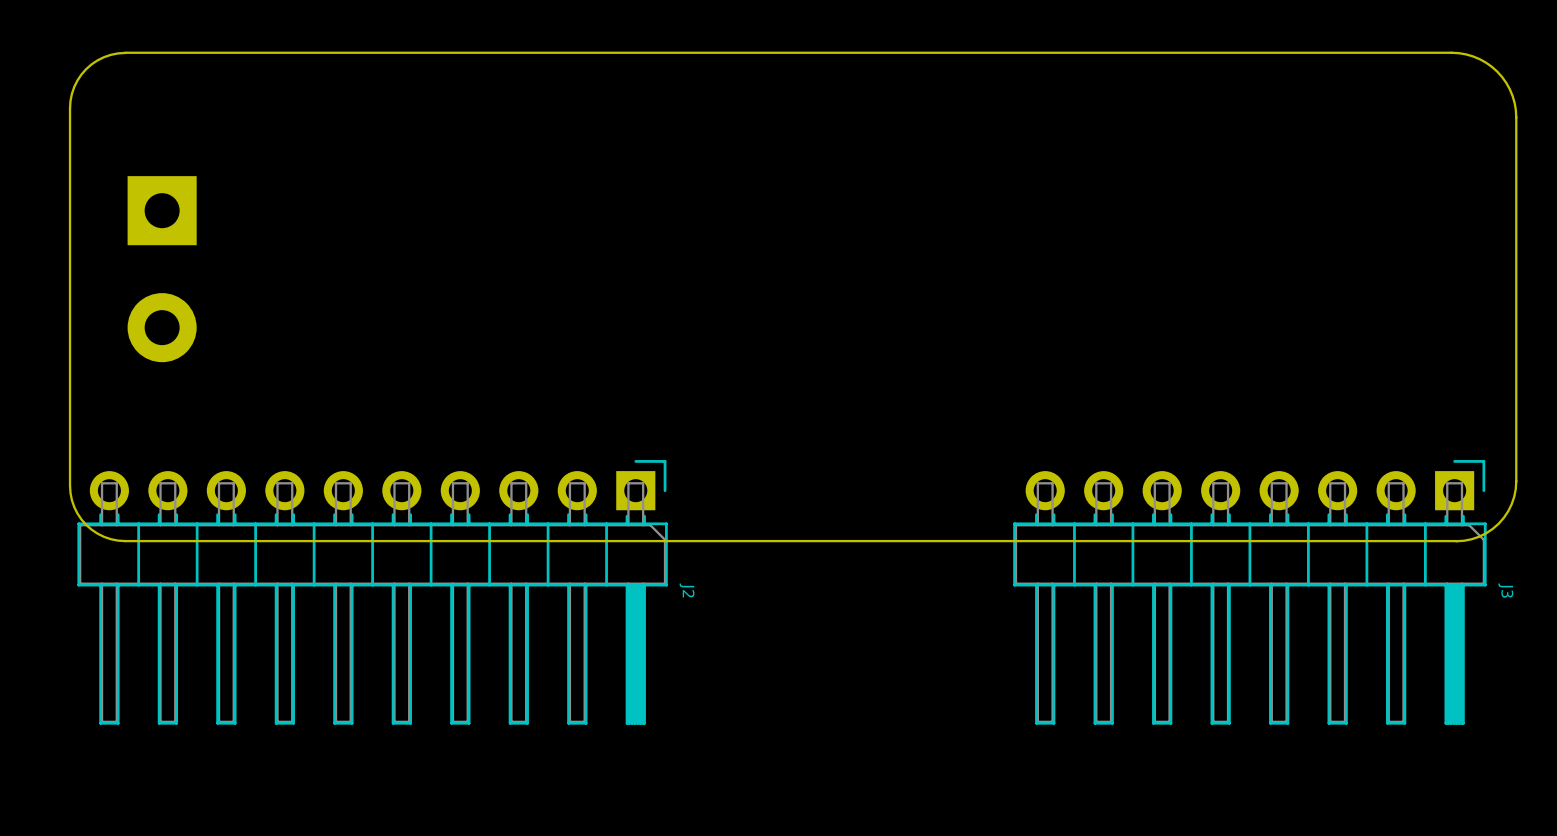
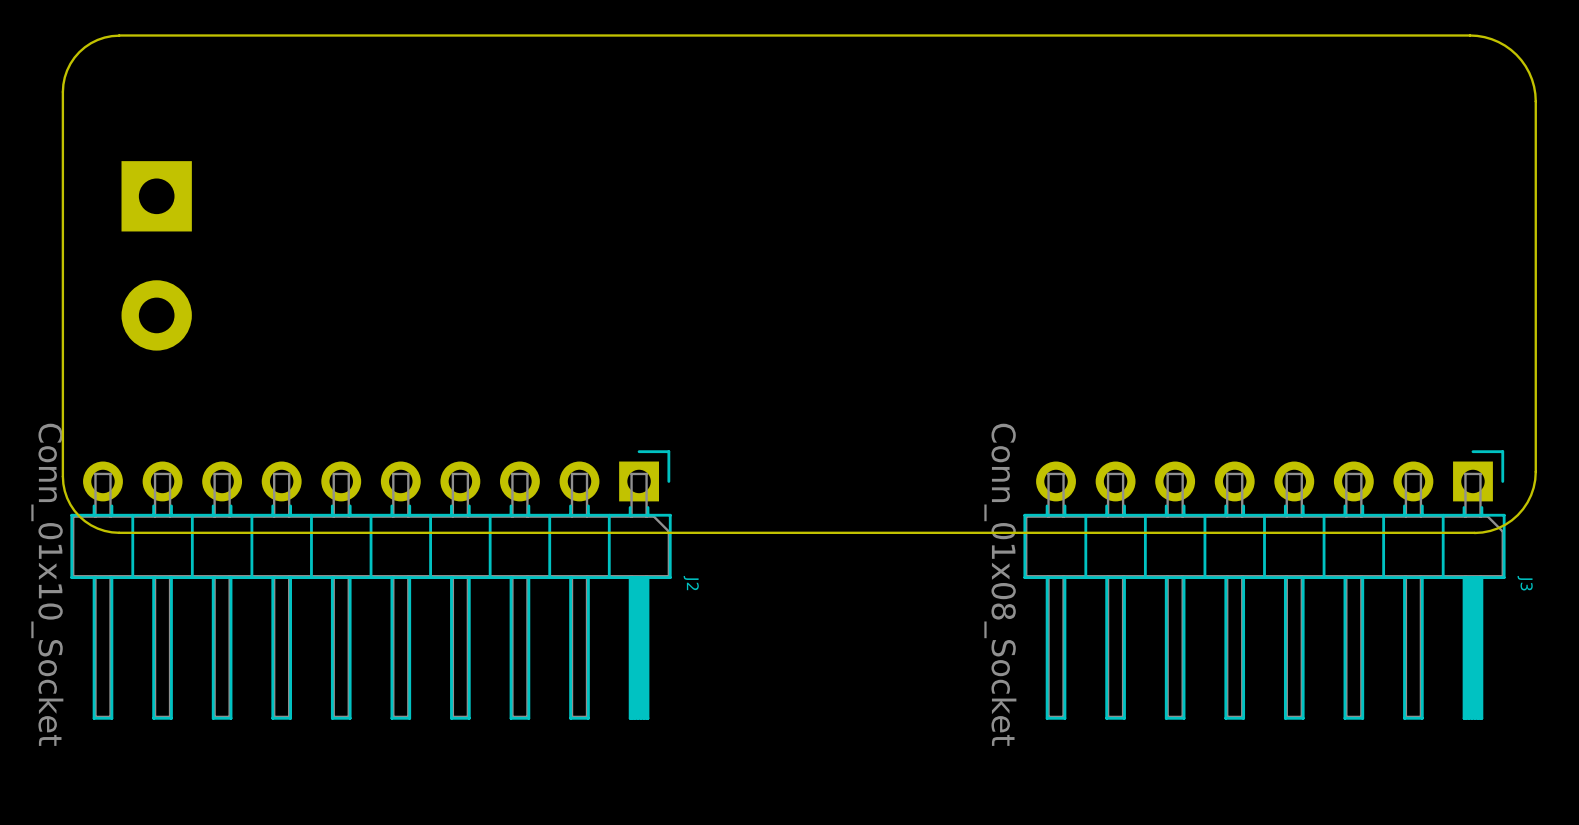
J2 value: none -> Conn_01x10_Socket (47, 584)
J3 value: none -> Conn_01x08_Socket (1000, 584)

